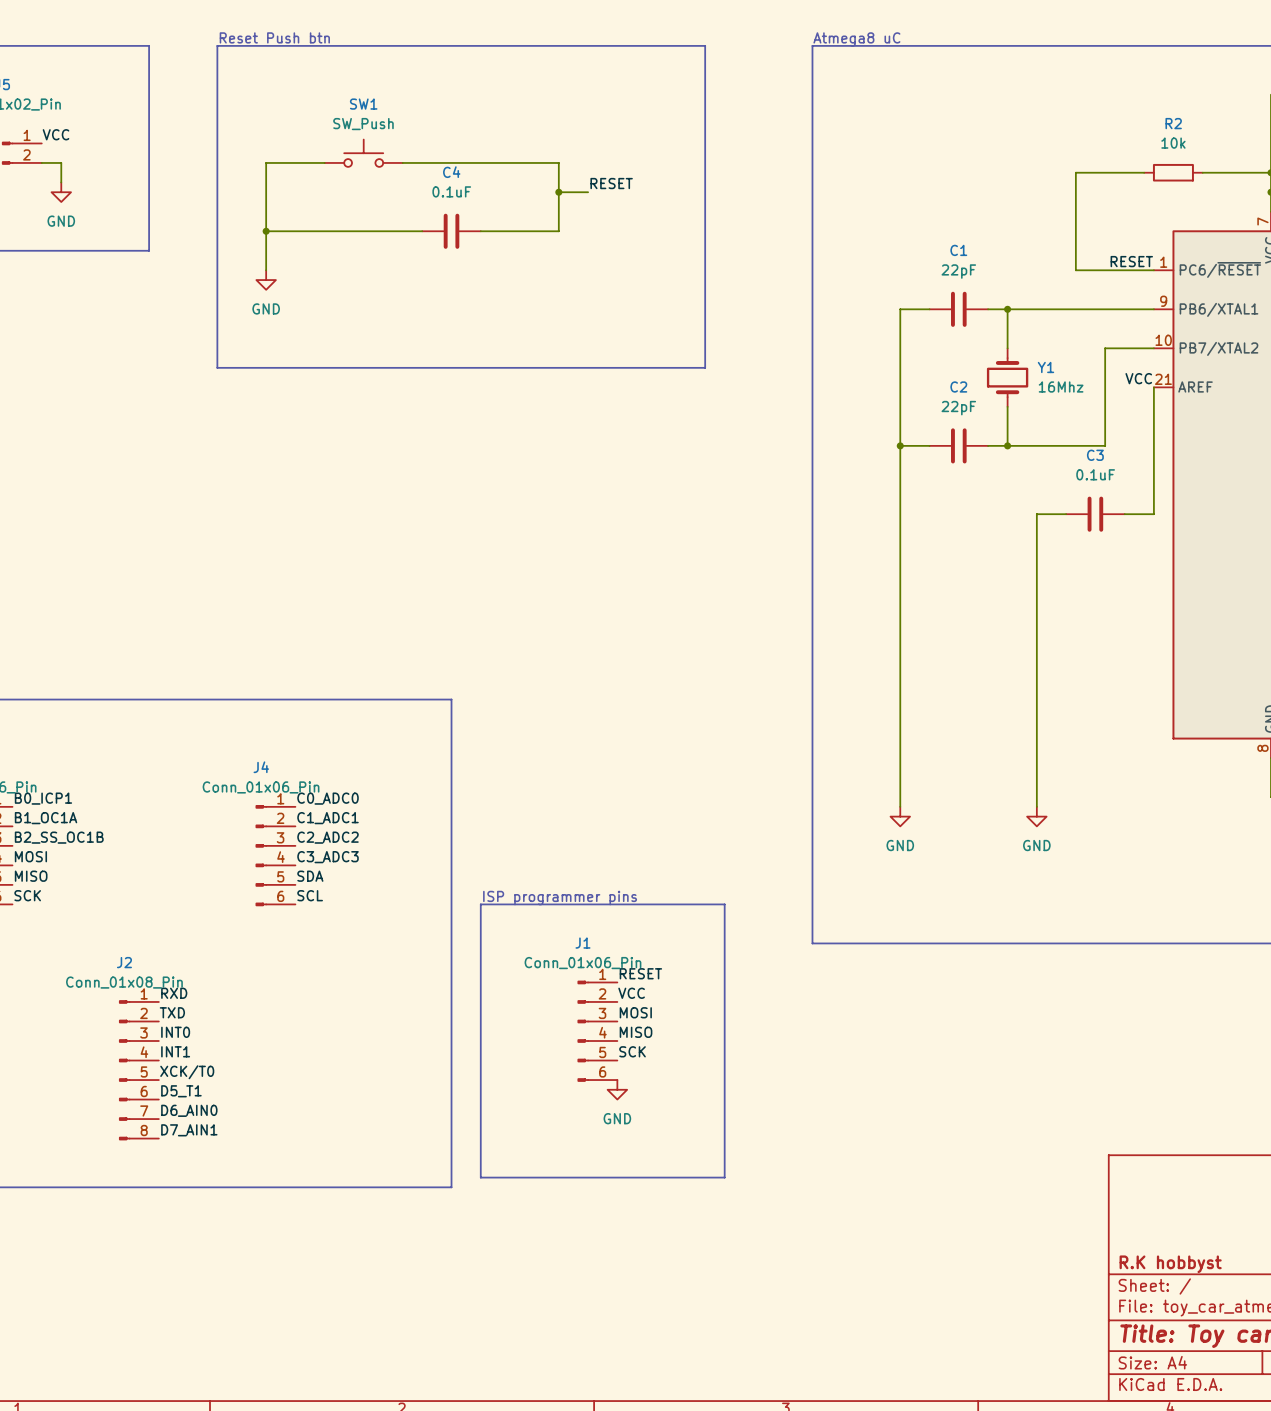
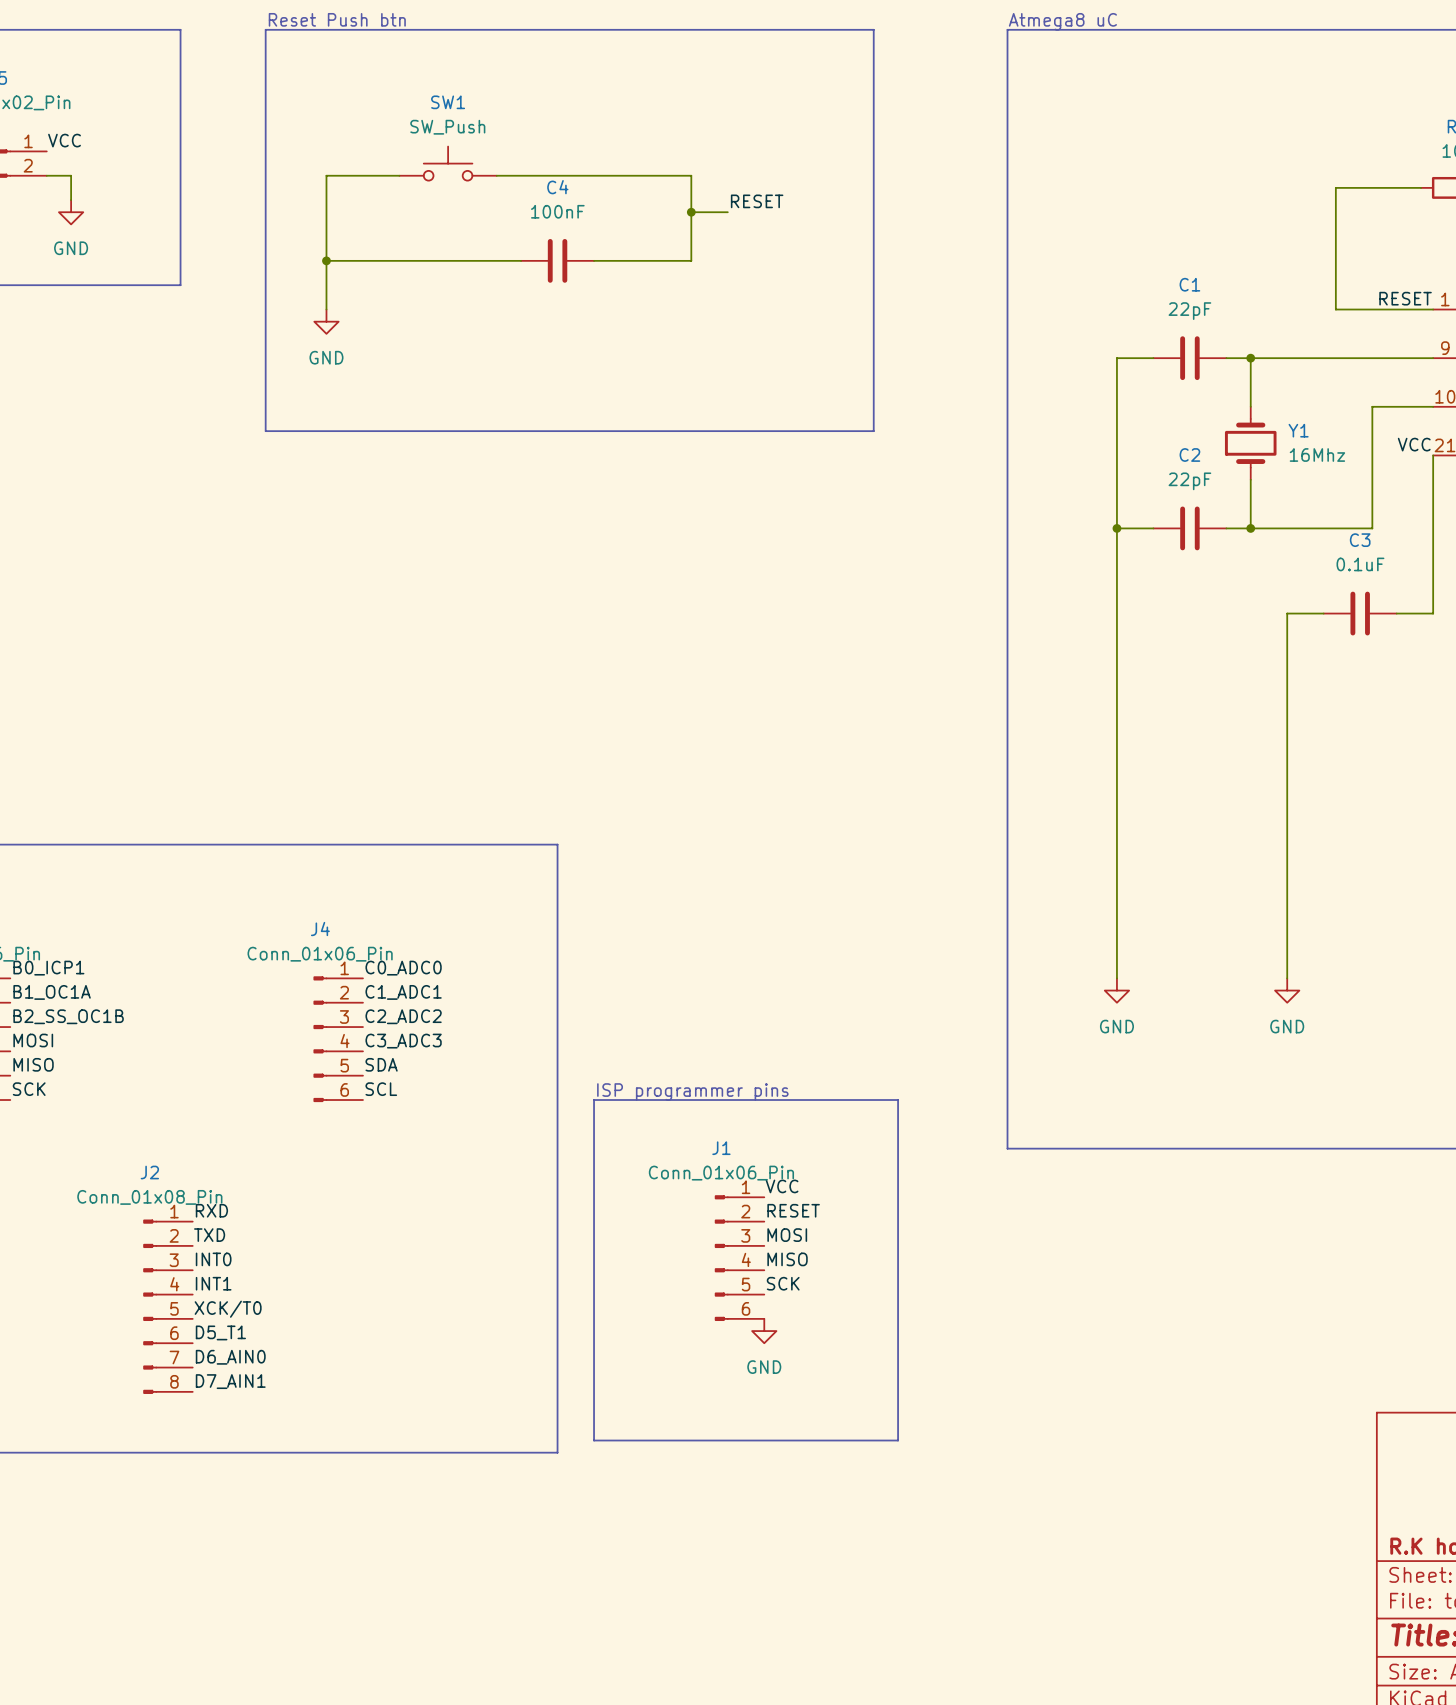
C4 value: 0.1uF (451, 191) -> 100nF (557, 211)
label: RESET (640, 973) -> VCC (782, 1186)
label: VCC (631, 993) -> RESET (793, 1210)

